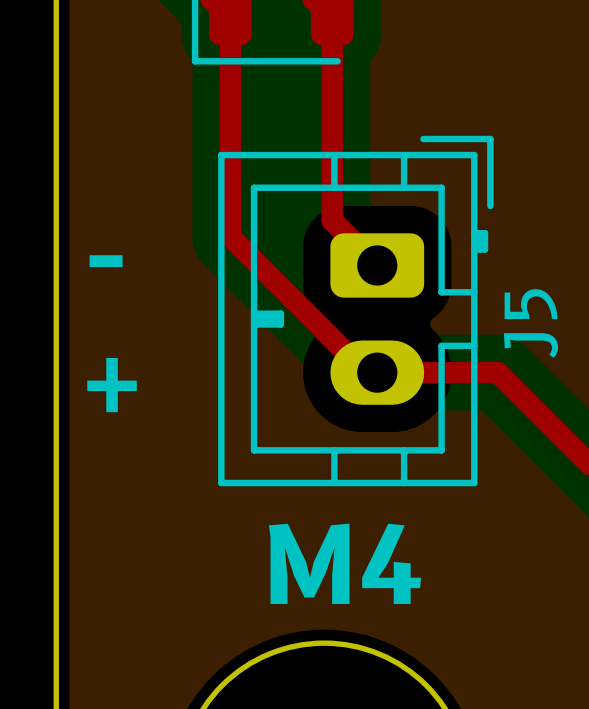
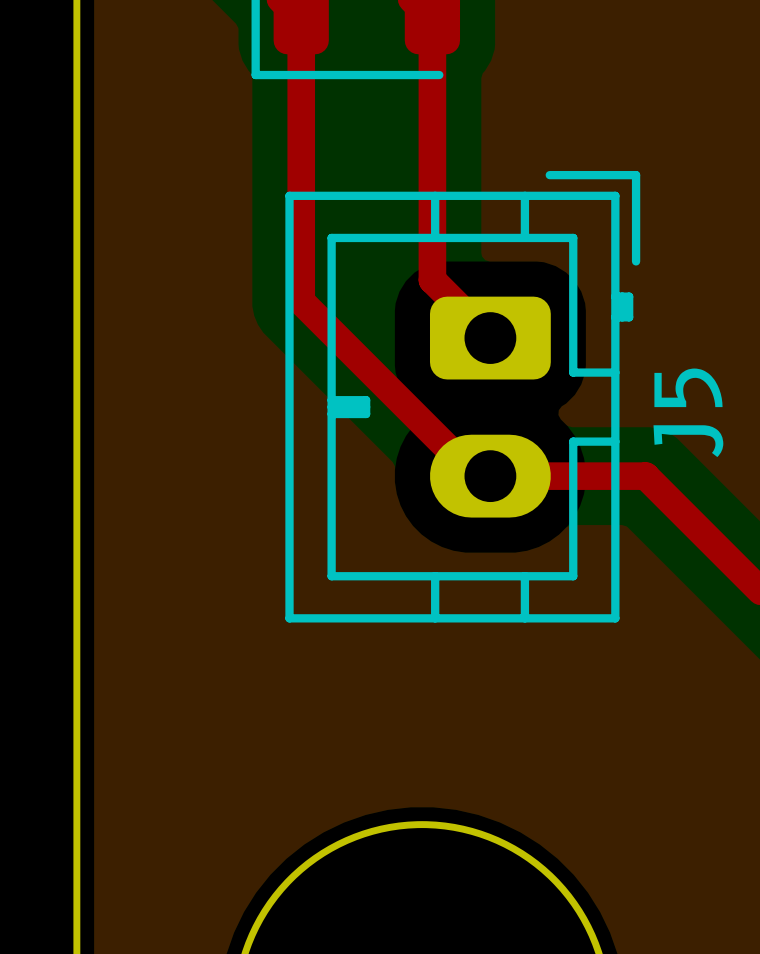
text: - (106, 261) -> none
text: + (112, 385) -> none
text: M4 (345, 563) -> none

